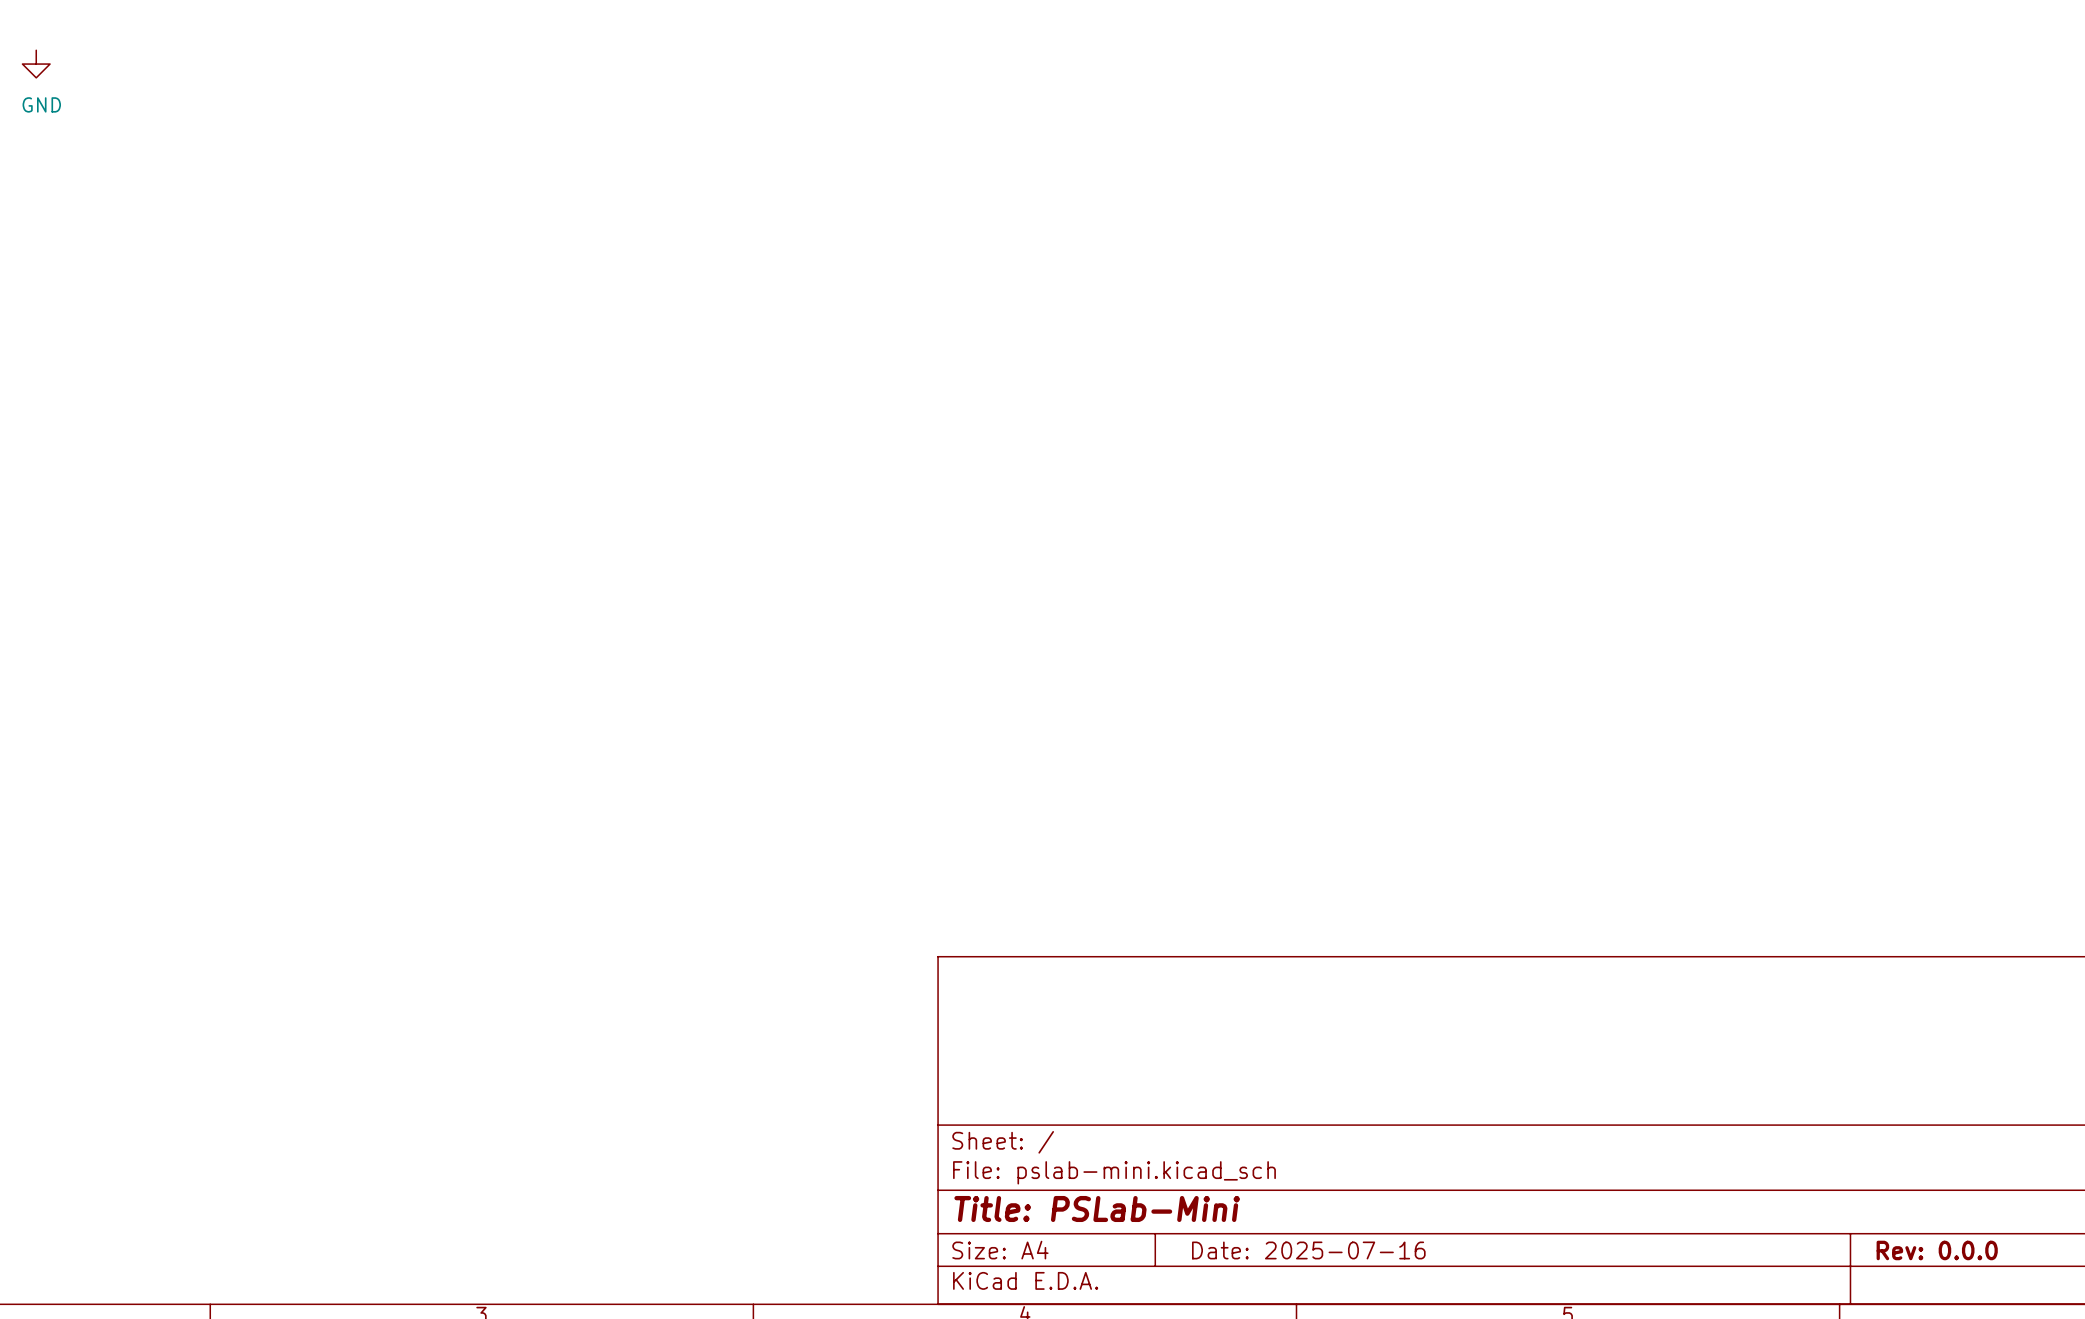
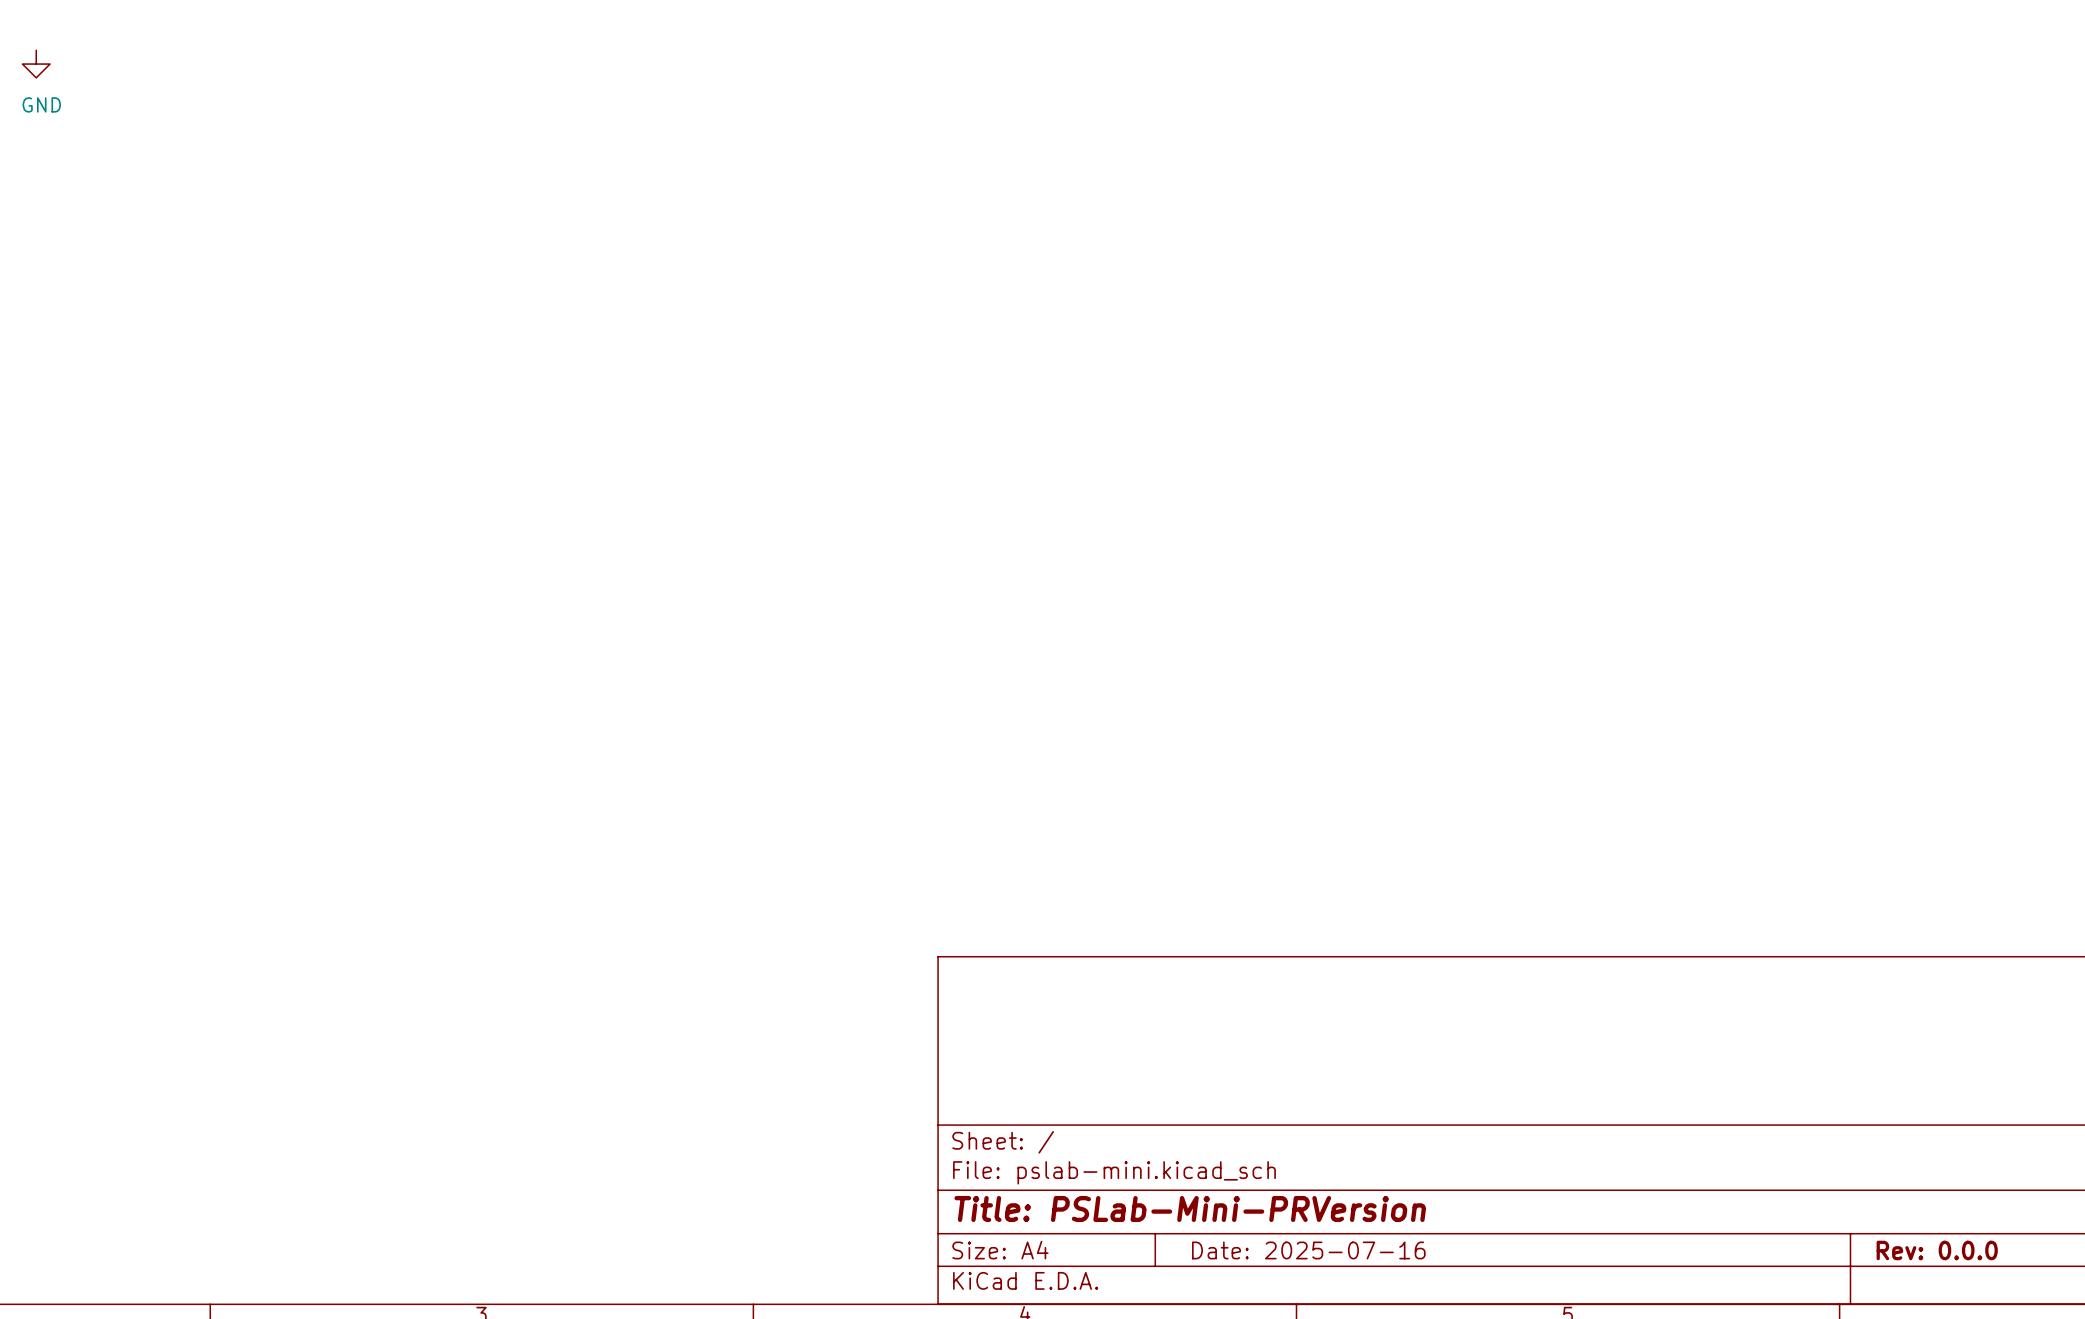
title block: Title: PSLab-Mini (1097, 1209) -> Title: PSLab-Mini-PRVersion (1190, 1209)

